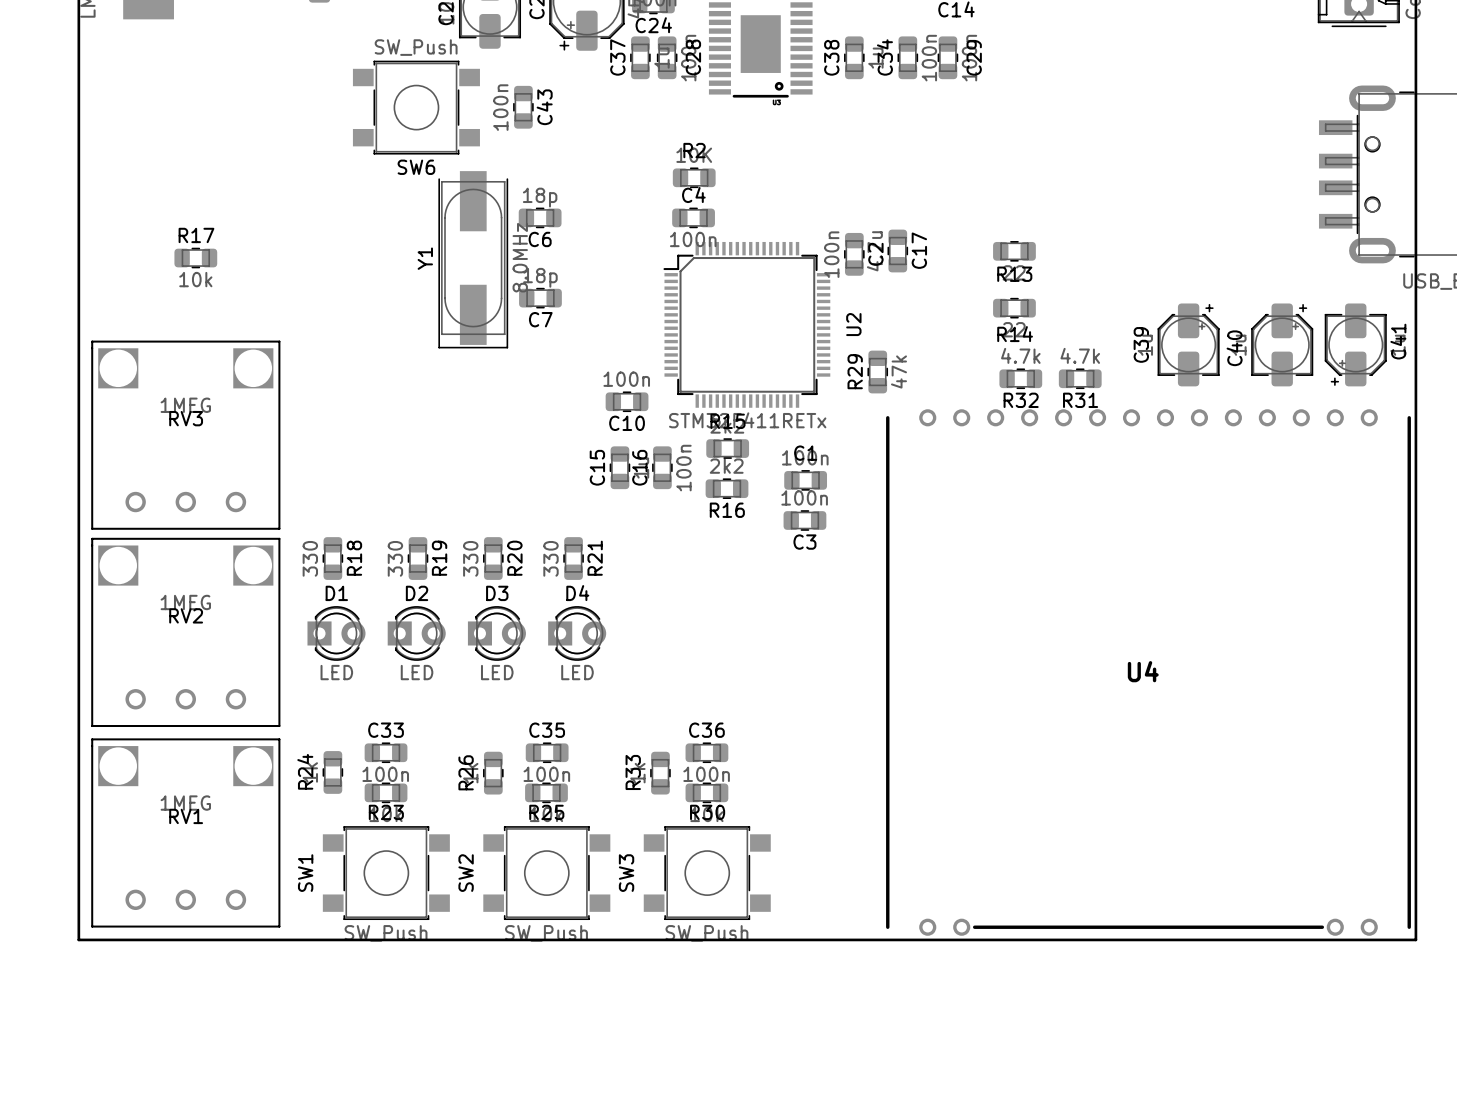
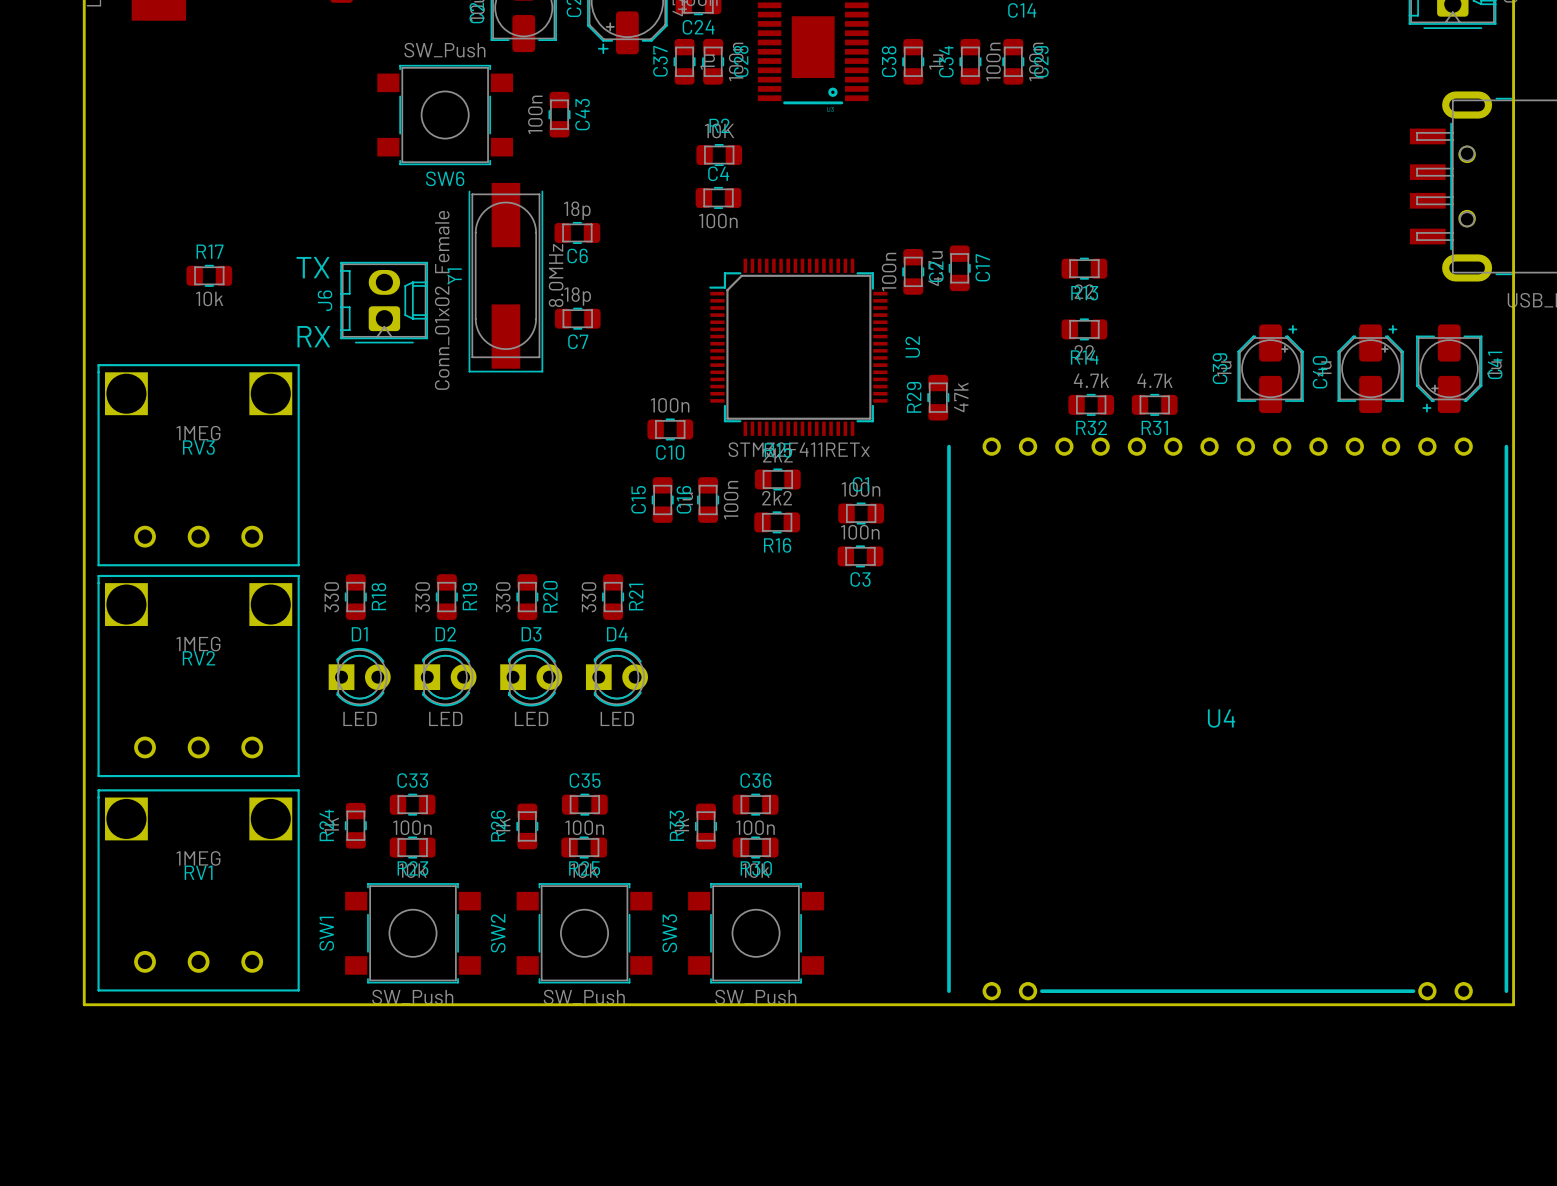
R2 position: (694, 177) -> (719, 155)
C4 position: (693, 217) -> (718, 197)
text: none -> TX (313, 267)
J6: none -> Conn_01x02_Female (384, 302)
text: none -> RX (313, 336)

